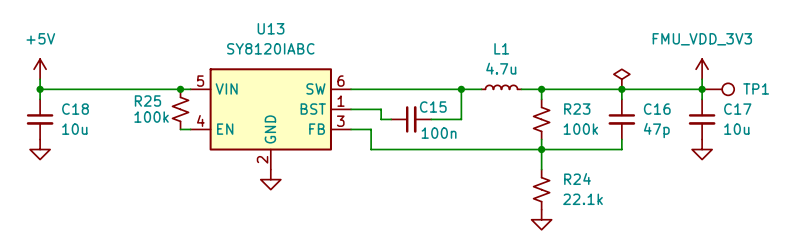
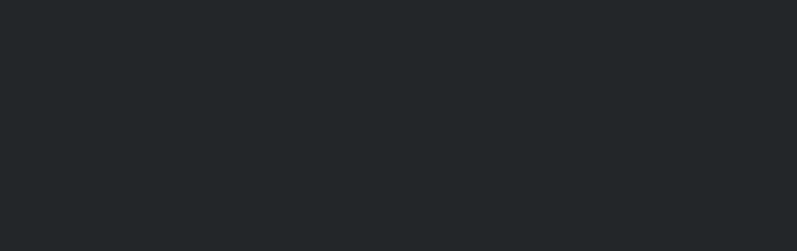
power symbol: +5V (40, 69) -> none
power symbol: FMU_VDD_3V3 (702, 69) -> none
wire: (40, 79) (40, 99) -> none
power symbol: (621, 79) -> none
wire: (702, 79) (702, 99) -> none
L1: 4.7u (501, 87) -> none
wire: (40, 89) (190, 89) -> none
junction: (40, 89) -> none
junction: (180, 89) -> none
wire: (351, 89) (481, 89) -> none
wire: (461, 89) (461, 119) (431, 119) -> none
junction: (461, 89) -> none
wire: (521, 89) (702, 89) -> none
wire: (541, 89) (541, 99) -> none
junction: (541, 89) -> none
wire: (621, 89) (621, 99) -> none
junction: (621, 89) -> none
junction: (702, 89) -> none
TP1: (718, 89) -> none
R25: 100k (180, 109) -> none
wire: (351, 109) (381, 109) (381, 119) (391, 119) -> none
U13: SY8120IABC (270, 118) -> none
C18: 10u (40, 119) -> none
C15: 100n (411, 119) -> none
R23: 100k (541, 119) -> none
C16: 47p (621, 119) -> none
C17: 10u (702, 119) -> none
wire: (180, 129) (190, 129) -> none
wire: (351, 129) (371, 129) (371, 149) (621, 149) (621, 139) -> none
wire: (541, 139) (541, 169) -> none
power symbol: (40, 149) -> none
junction: (541, 149) -> none
power symbol: (702, 149) -> none
power symbol: (270, 179) -> none
R24: 22.1k (541, 189) -> none
power symbol: (541, 219) -> none

